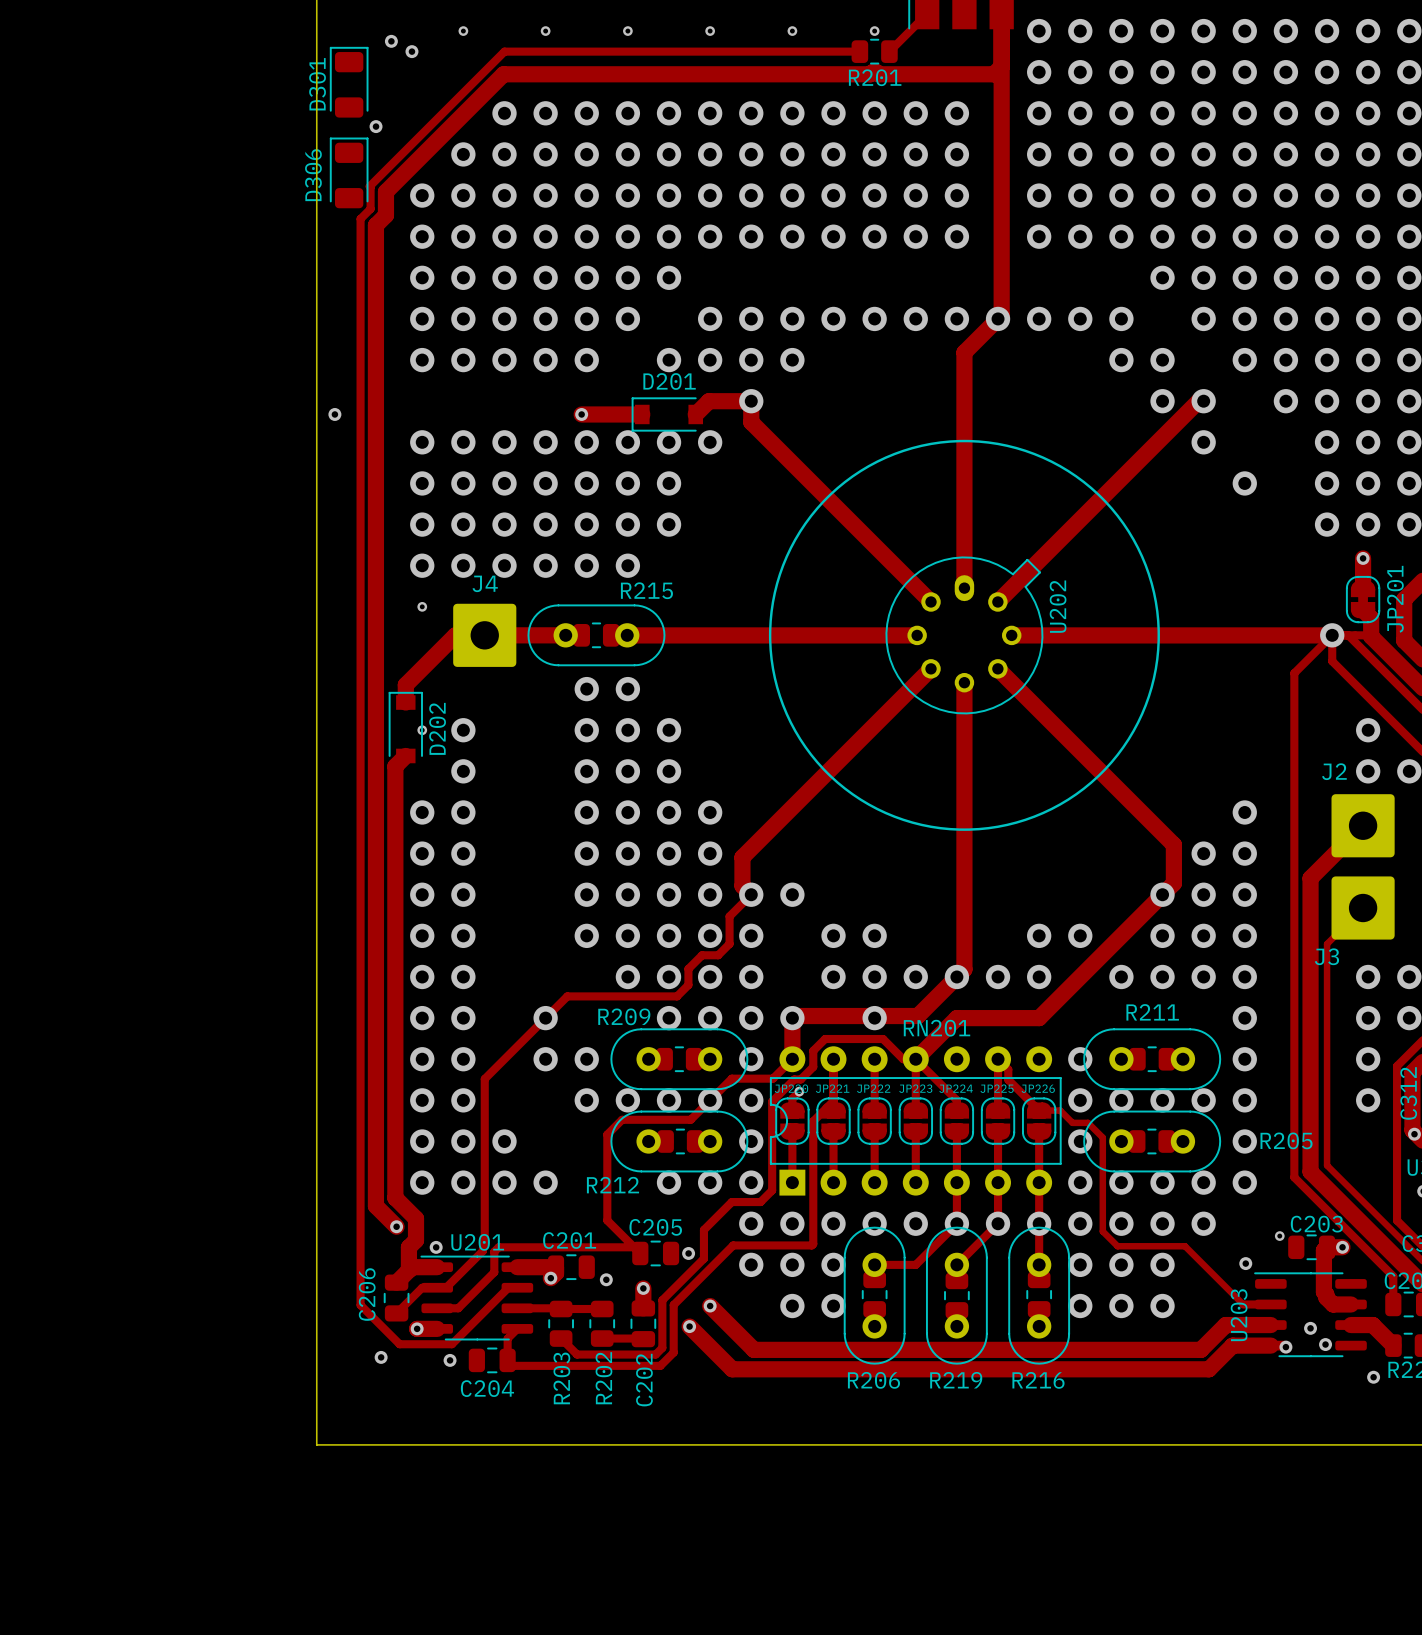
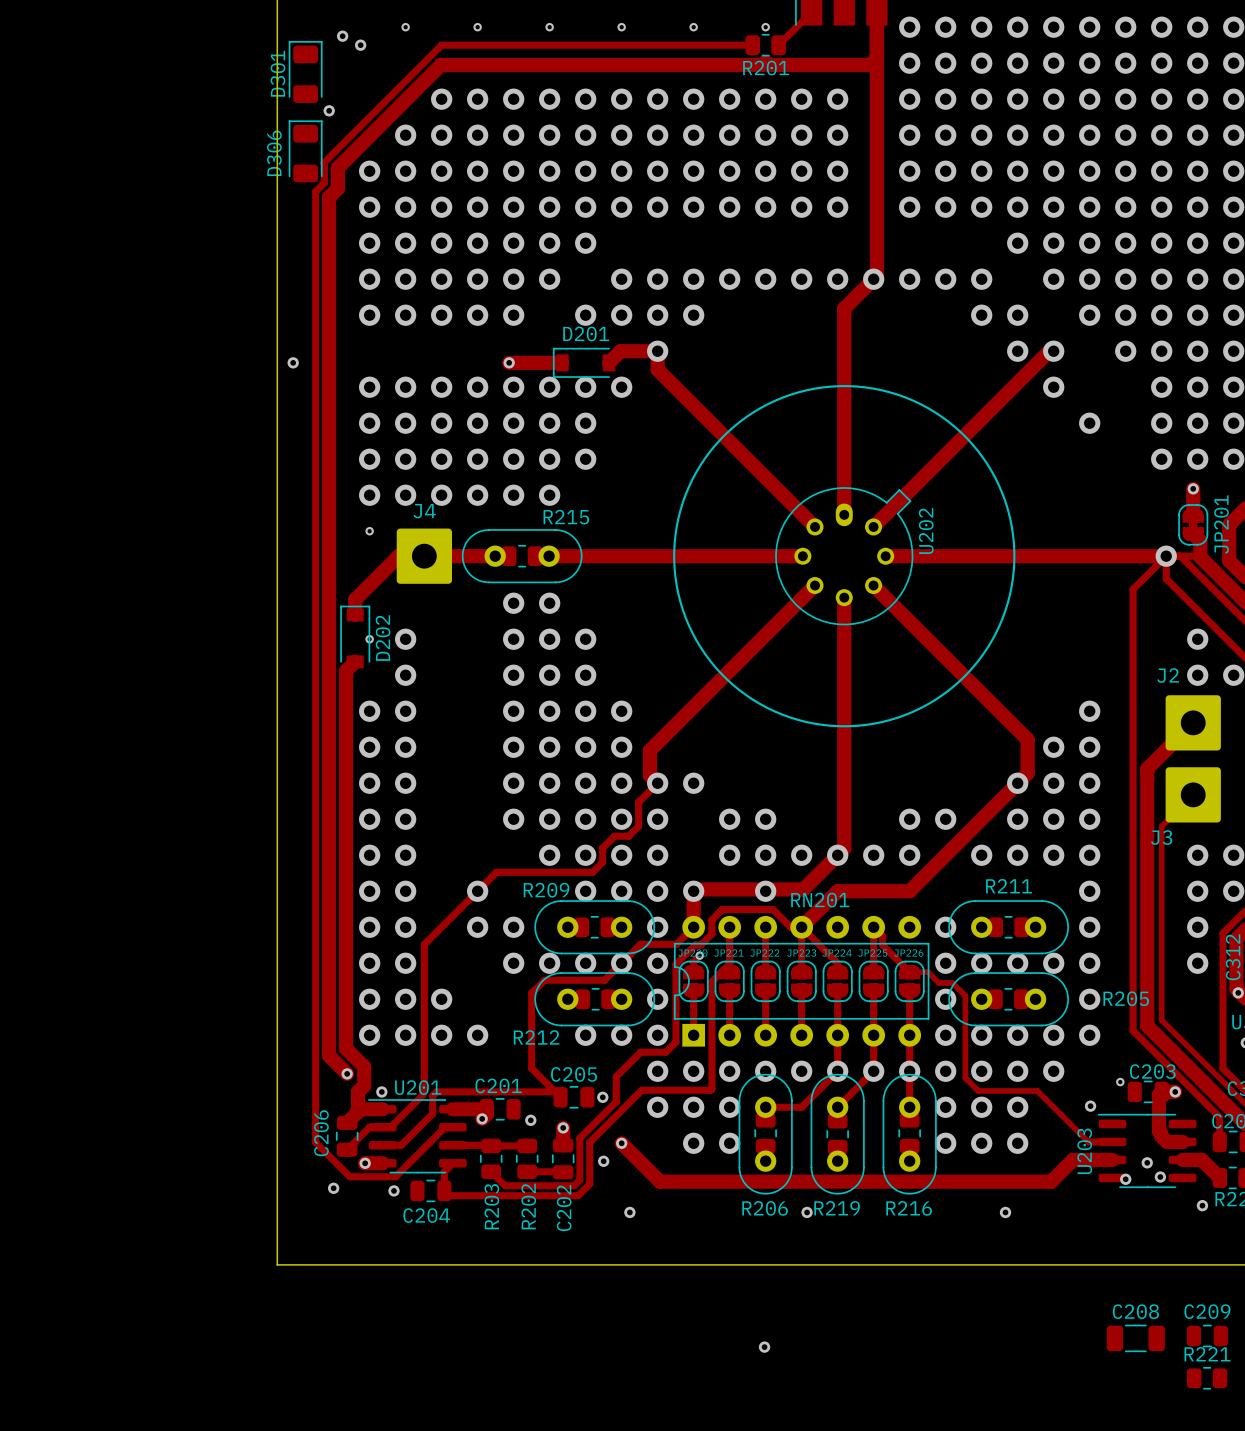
track: (689, 1326) (732, 1369) (1208, 1369) (1232, 1345) (1270, 1345) -> none
via: none -> (629, 1212)
via: none -> (807, 1212)
via: none -> (1005, 1212)
C209: none -> (1207, 1336)
C208: none -> (1135, 1338)
via: none -> (764, 1347)
R221: none -> (1207, 1378)

